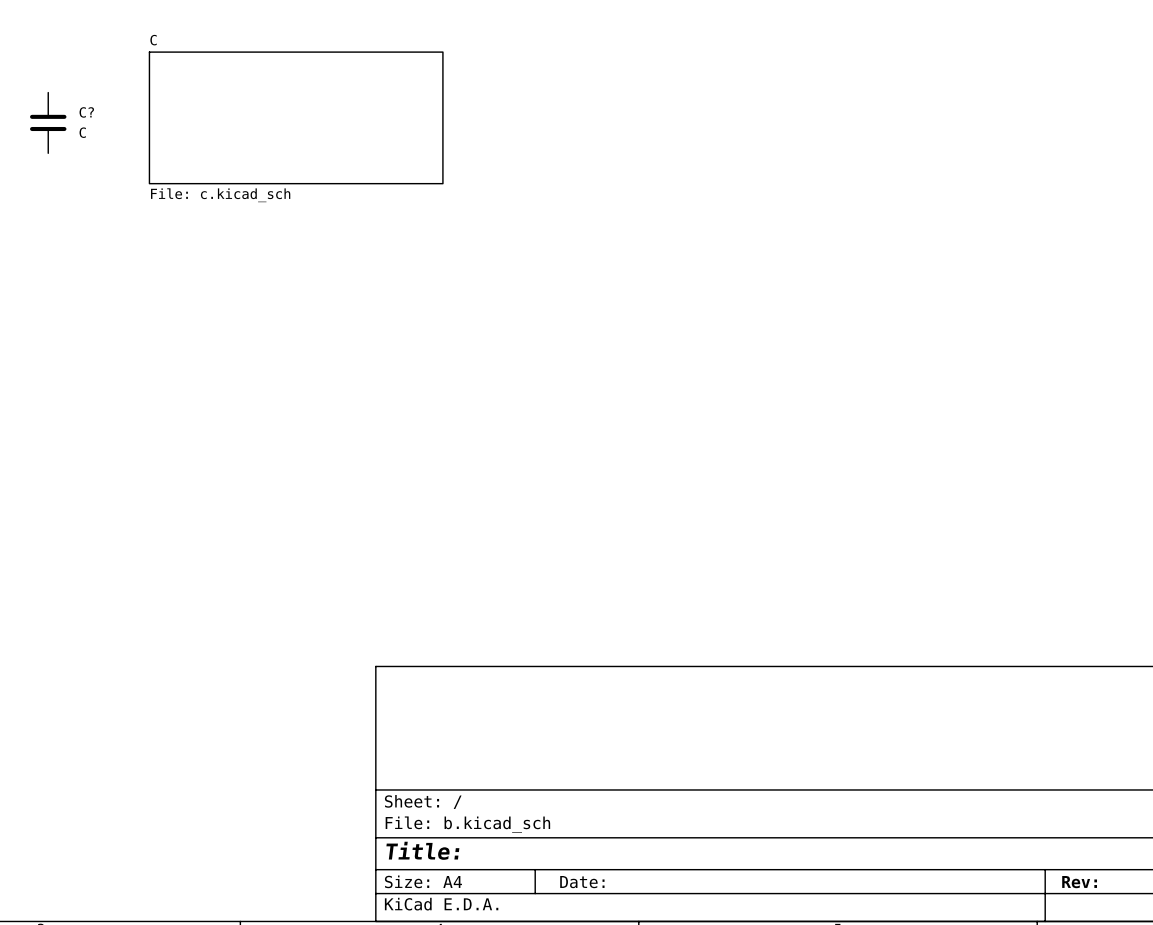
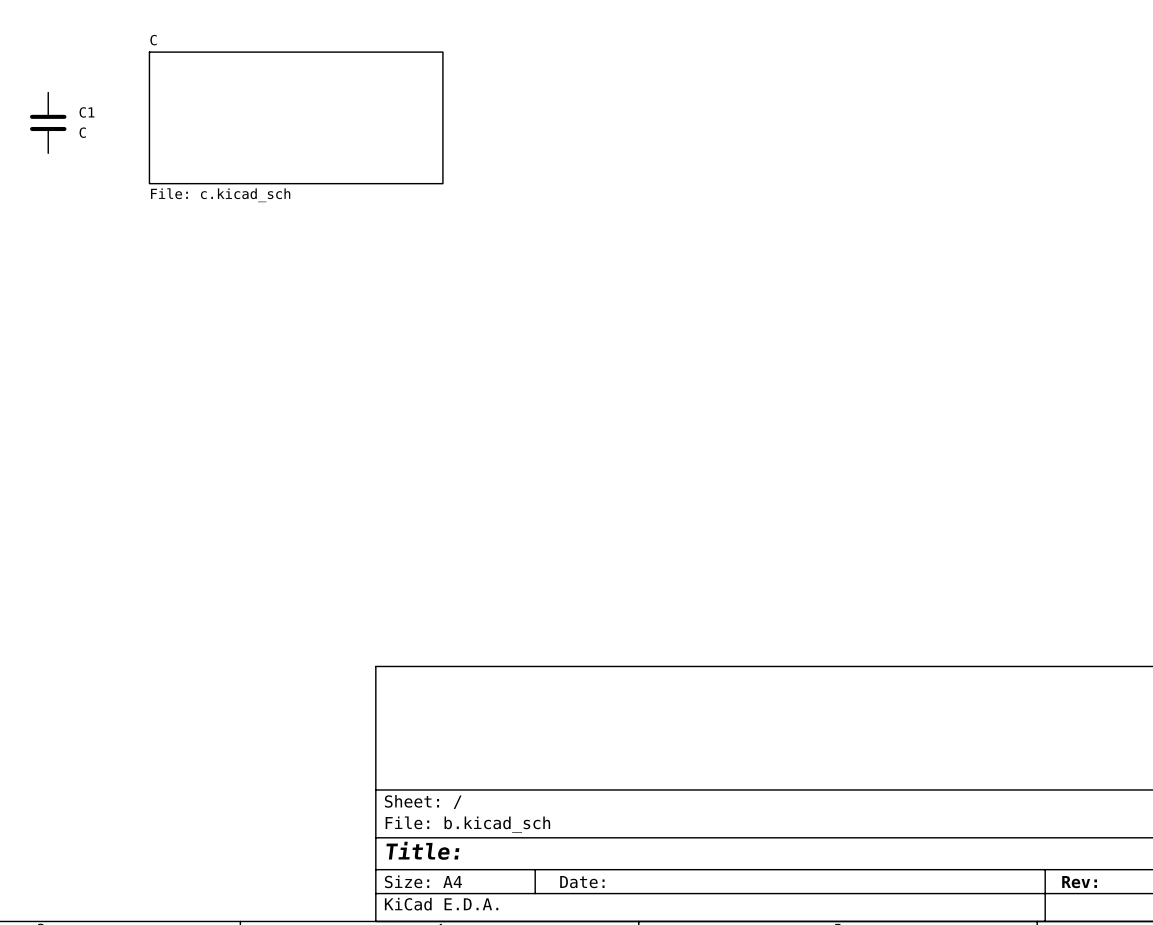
C? name: C? (86, 112) -> C1 (86, 112)

